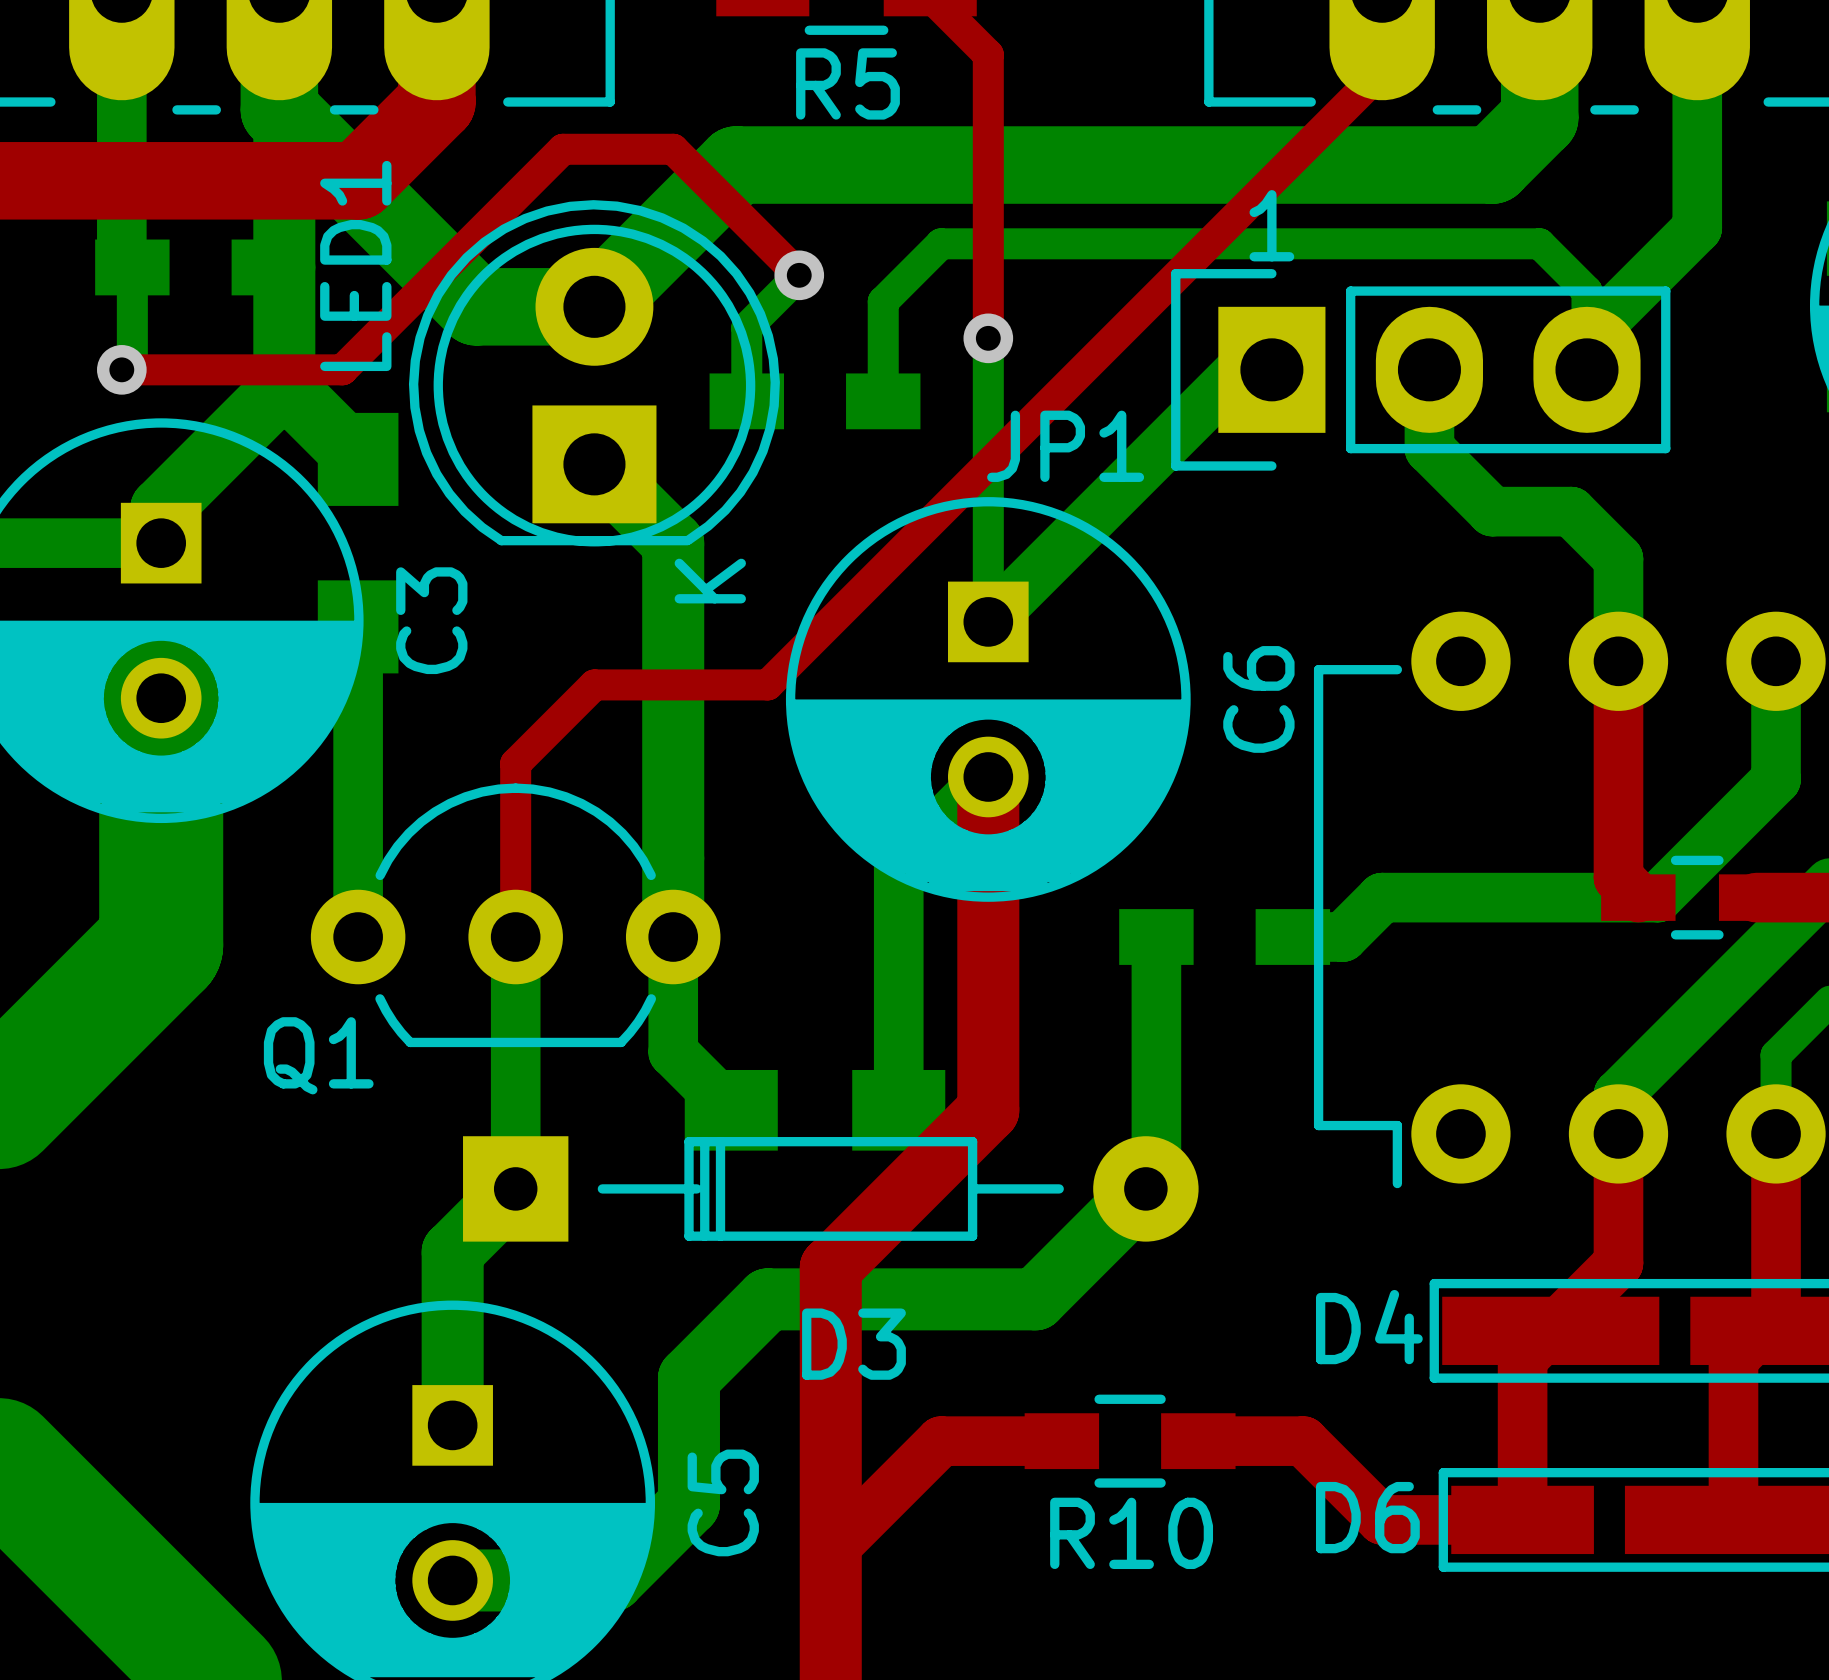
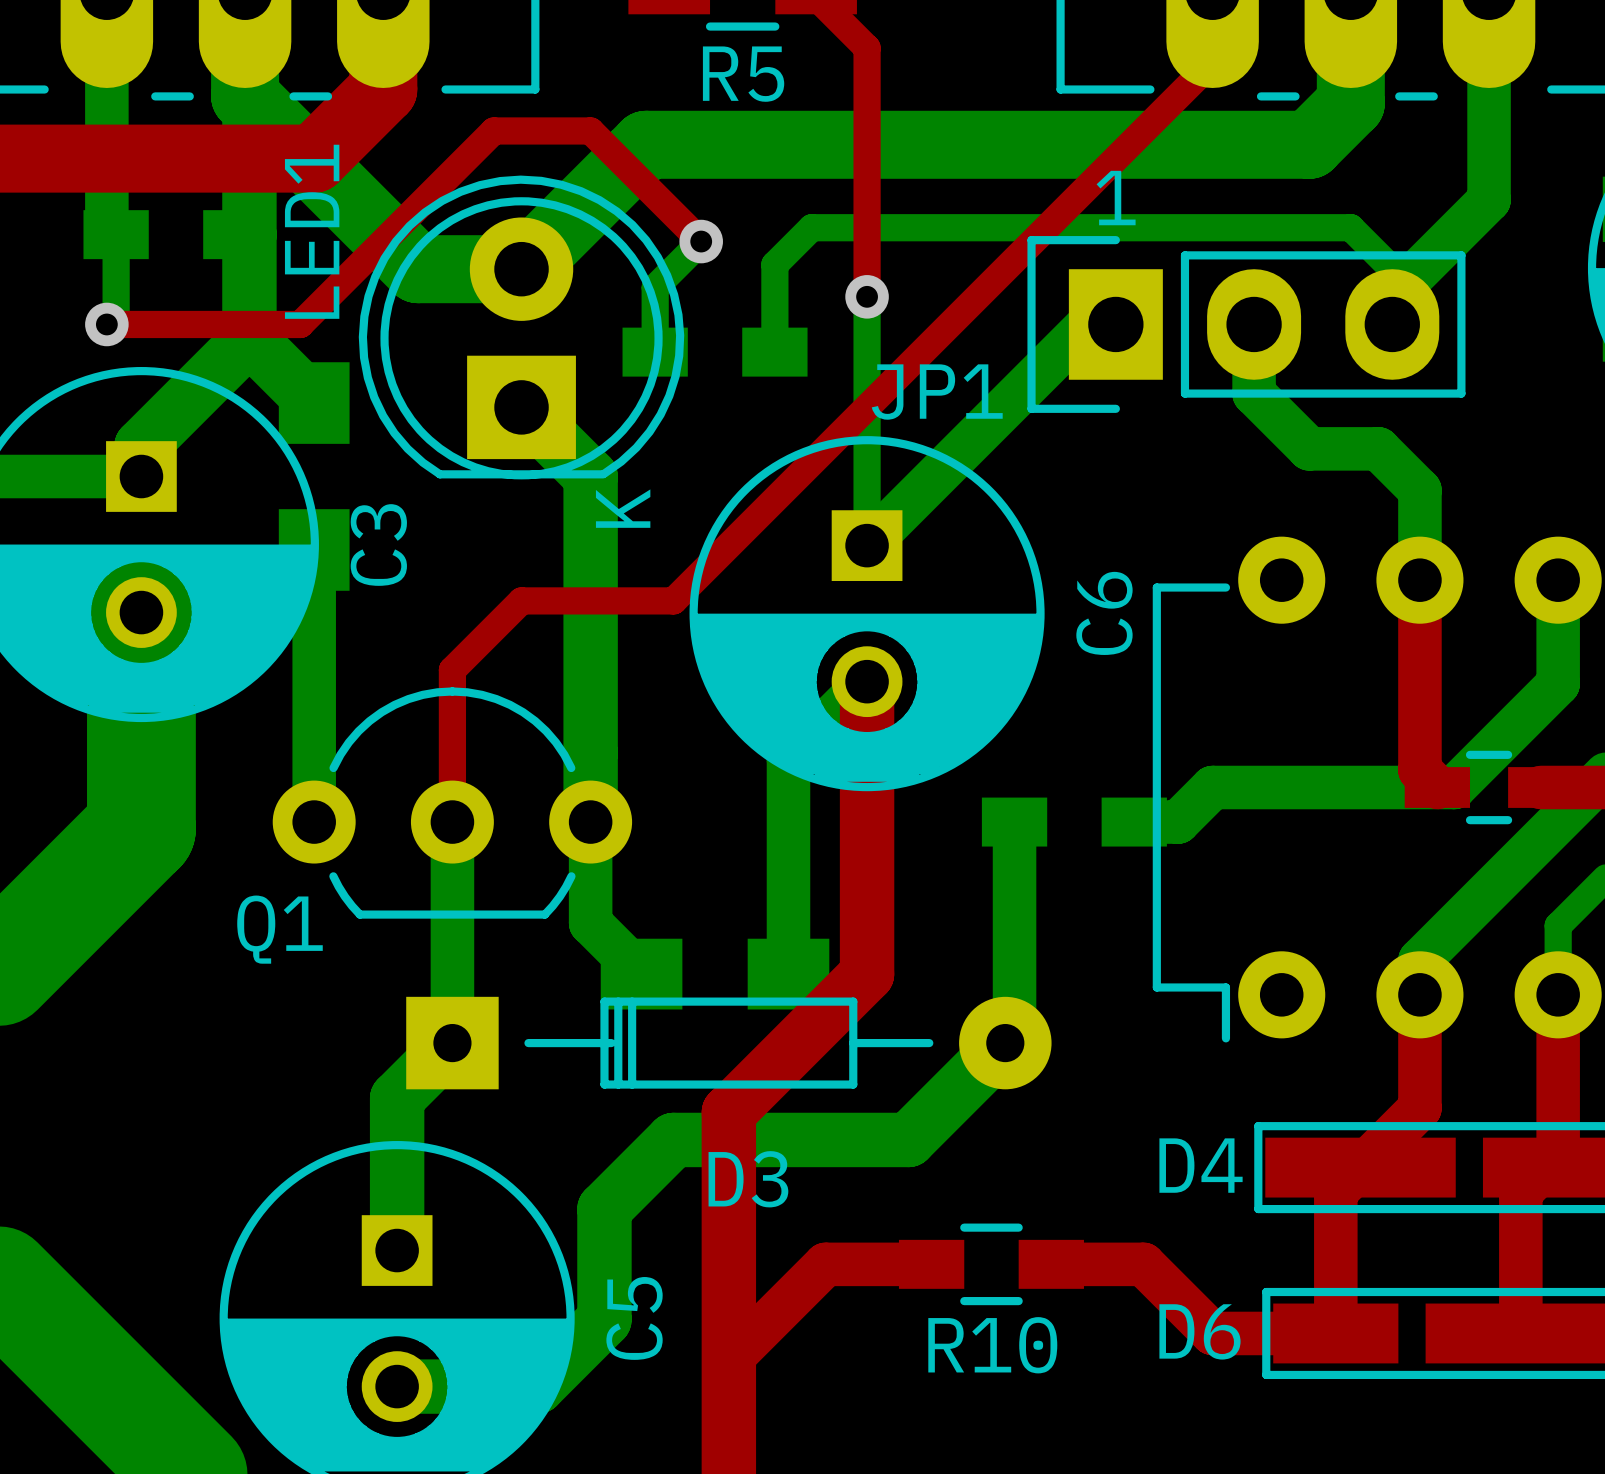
bottom track: (925, 259) (941, 243) (1539, 243) (1586, 291) (1586, 306) -> (811, 227) (1350, 227) (1392, 269)

